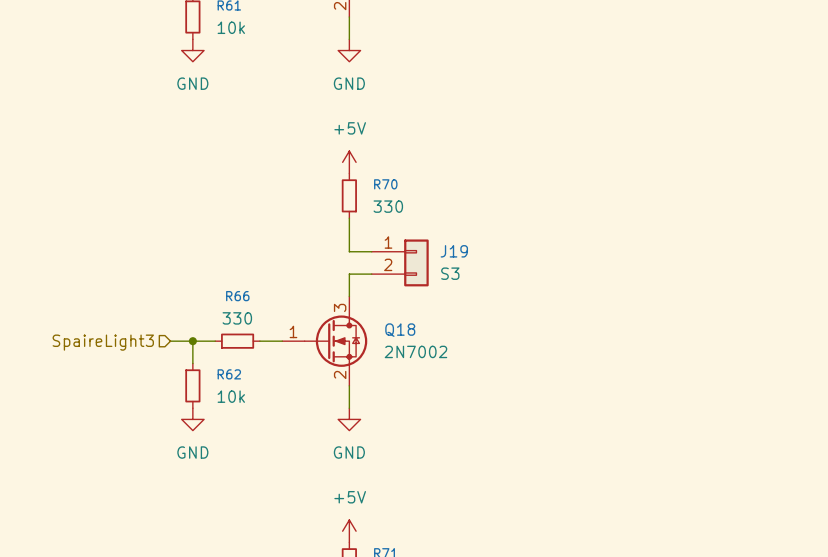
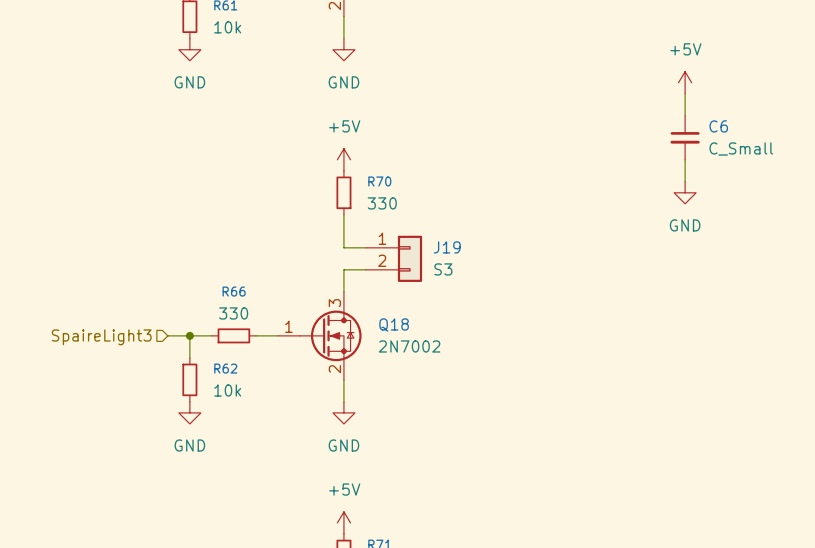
power symbol: none -> +5V (685, 82)
wire: none -> (685, 93) (685, 115)
C6: none -> C_Small (685, 137)
wire: none -> (685, 159) (685, 181)
power symbol: none -> GND (685, 192)

